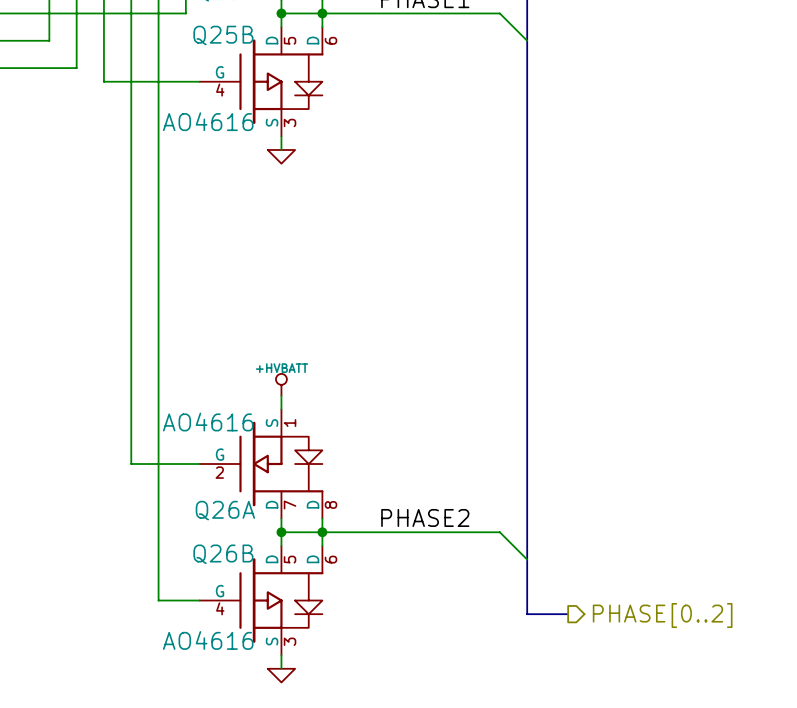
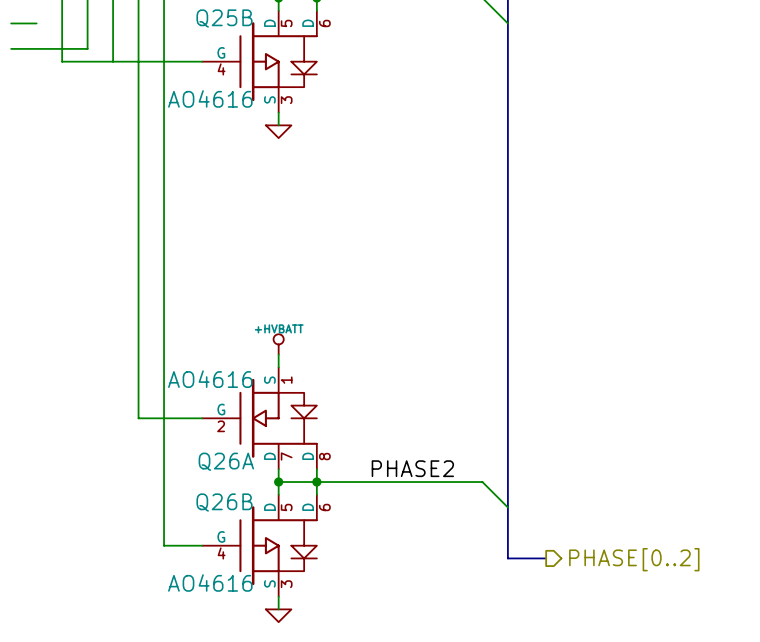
wire: (22, 40) (49, 40) -> (113, 61) (62, 61) (62, 23)

